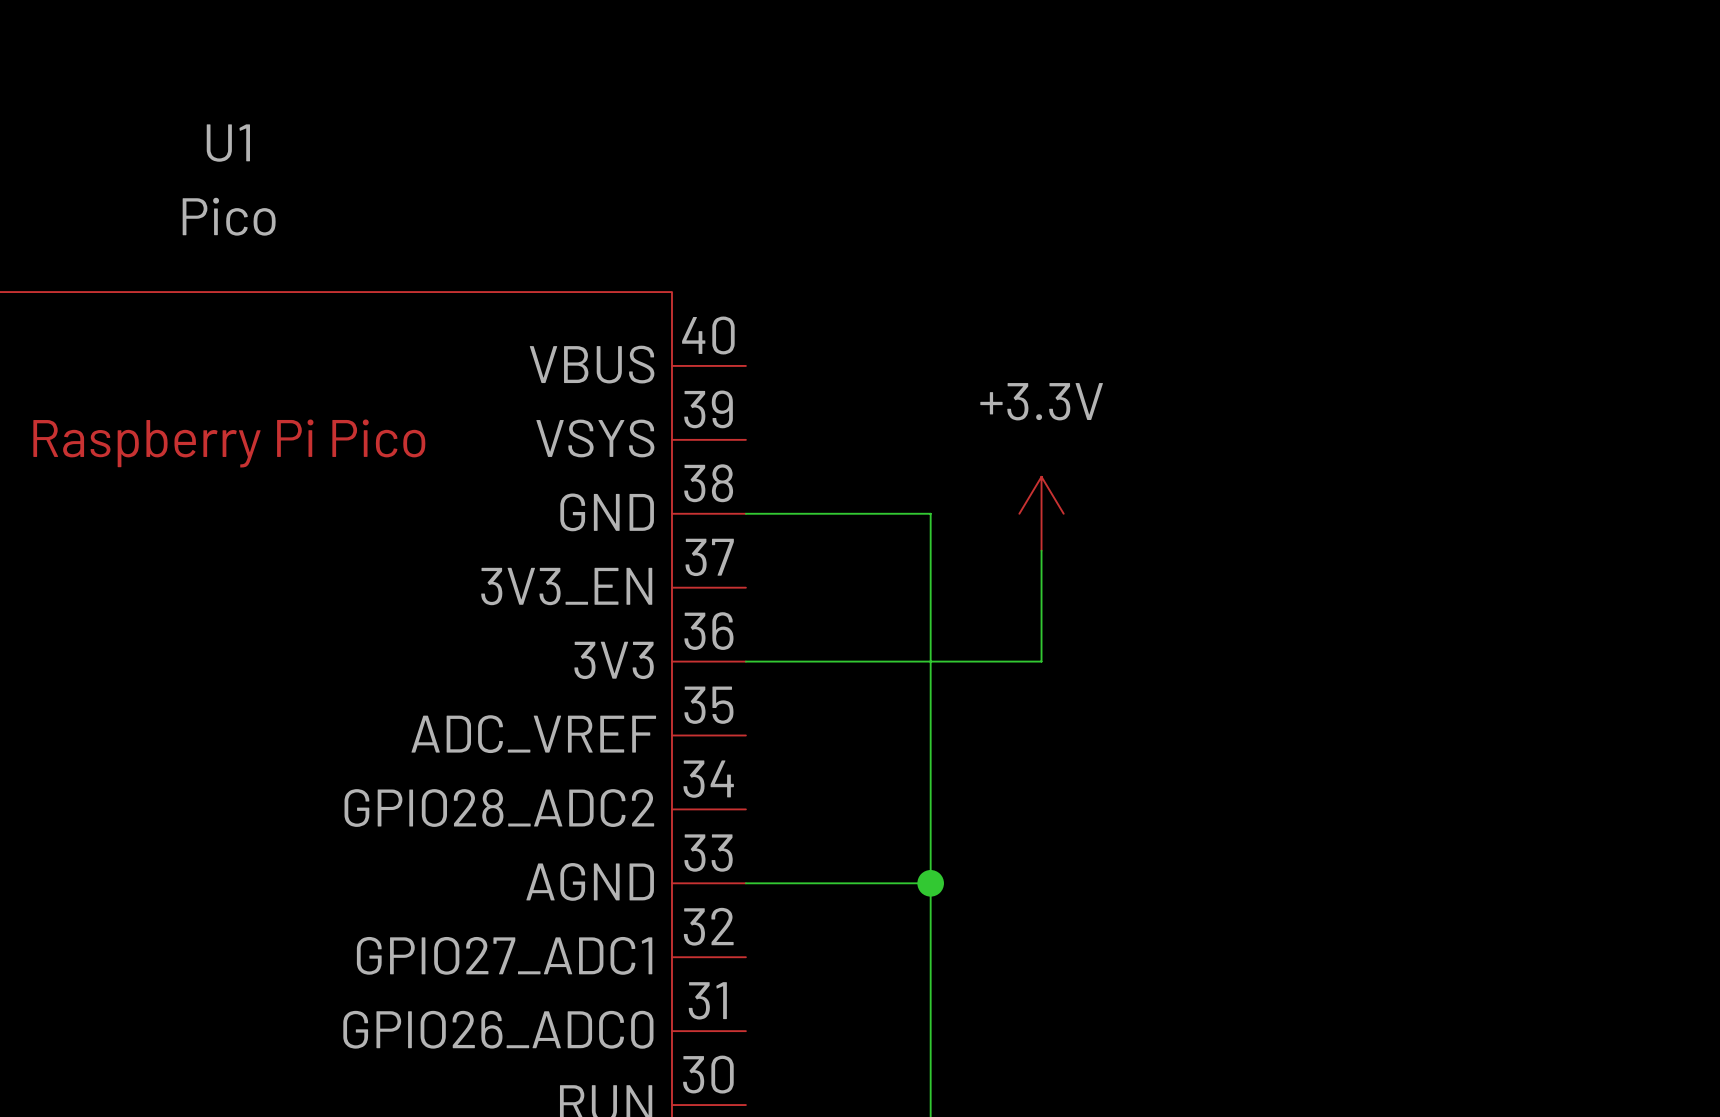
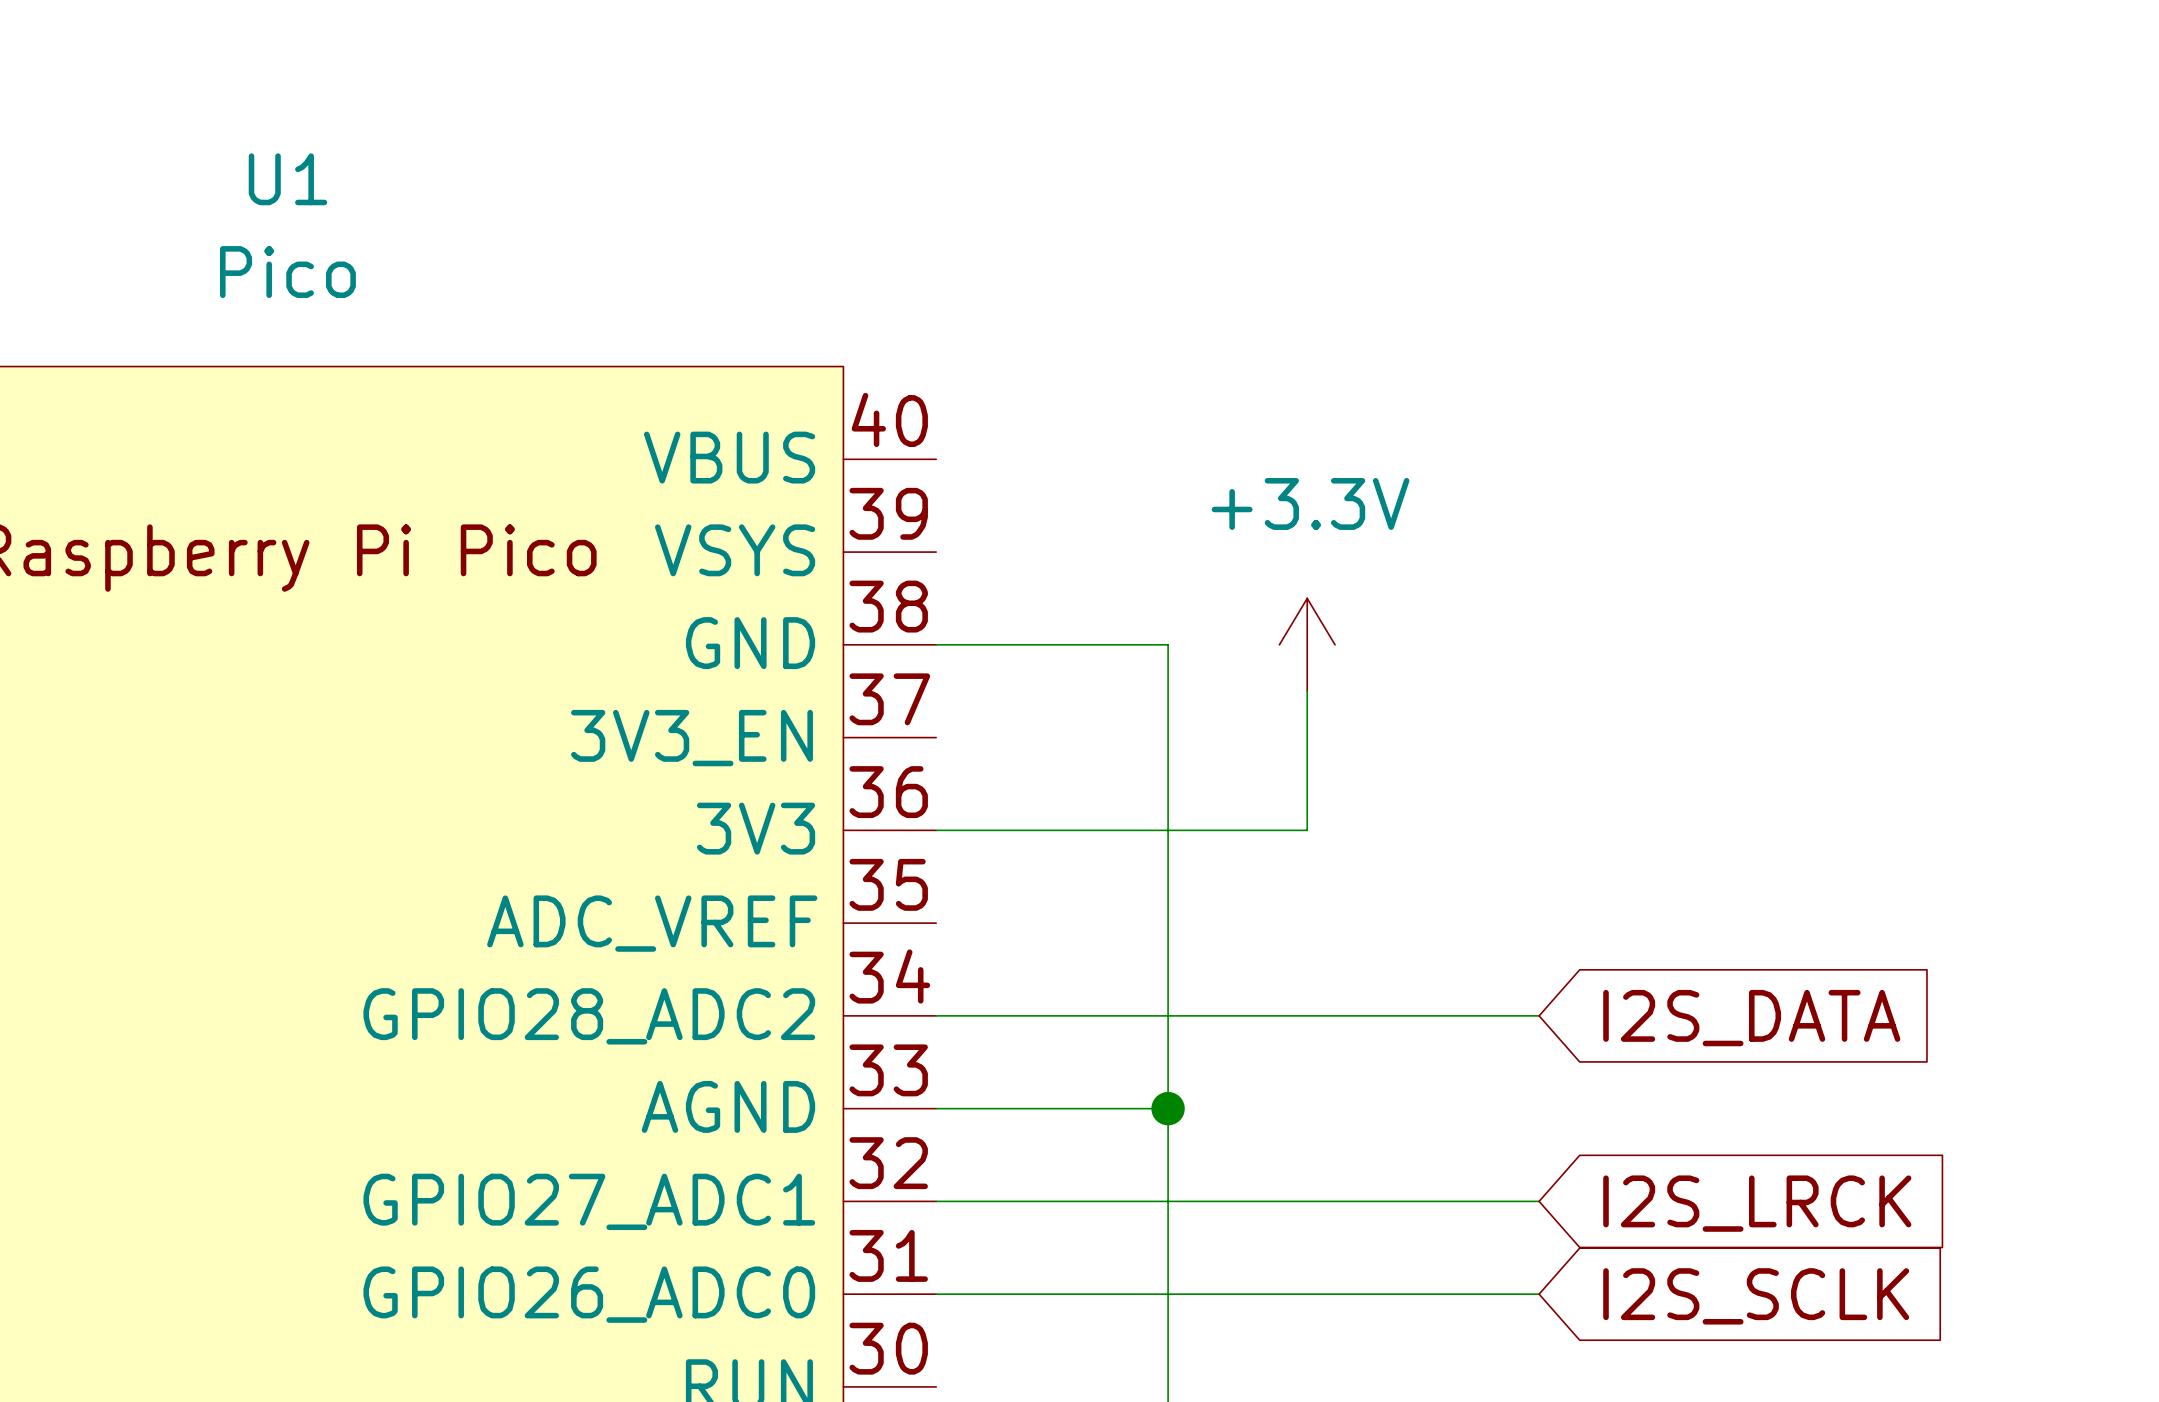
wire: none -> (936, 1015) (1539, 1015)
global label: none -> I2S_DATA (1751, 1018)
wire: none -> (936, 1201) (1539, 1201)
global label: none -> I2S_LRCK (1757, 1203)
wire: none -> (936, 1294) (1539, 1294)
global label: none -> I2S_SCLK (1756, 1296)

